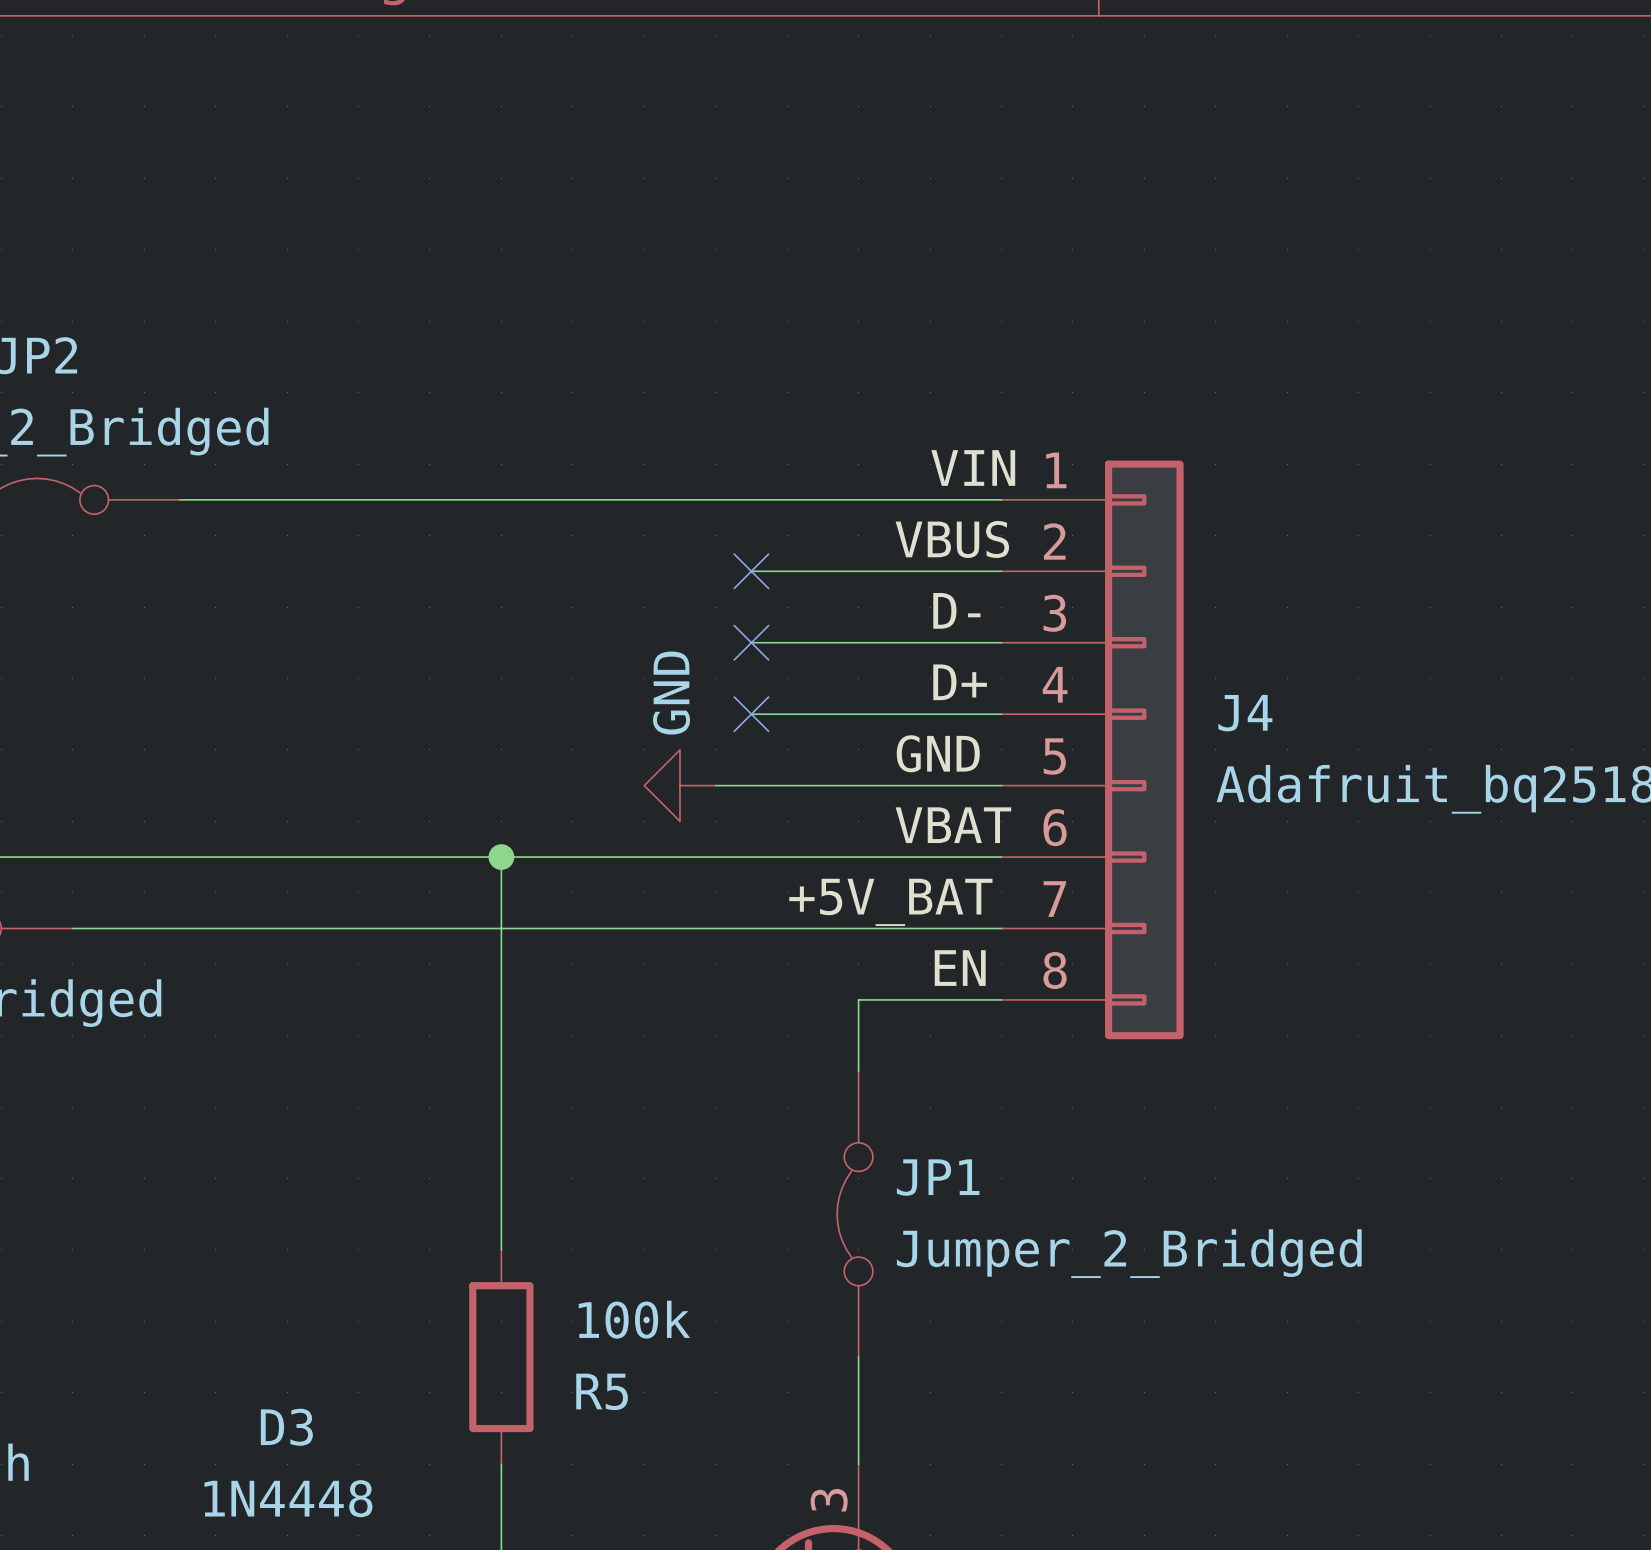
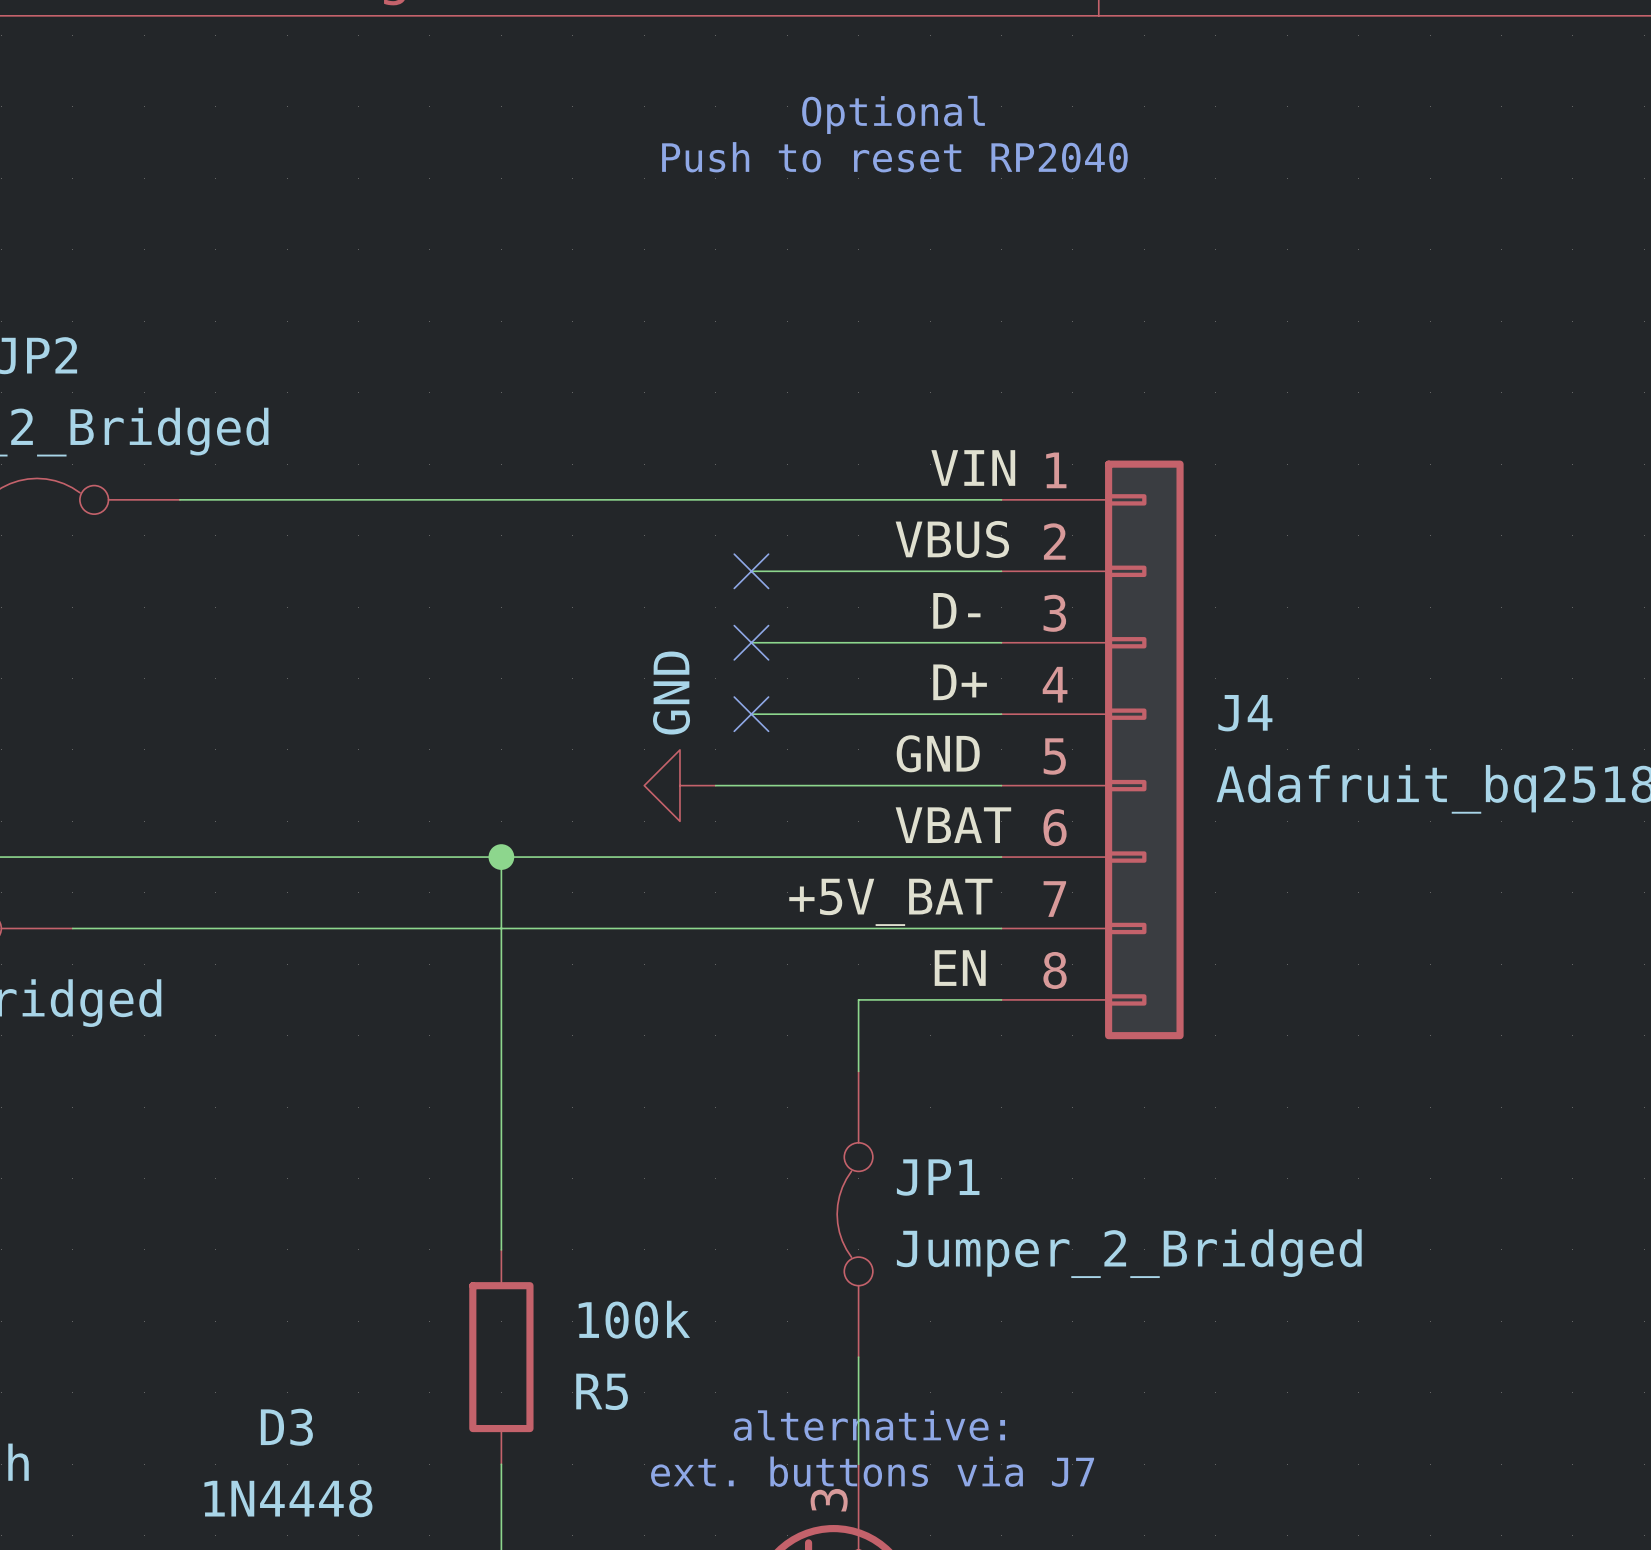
text: none -> Optional (893, 114)
text: none -> Push to reset RP2040 (894, 157)
text: none -> alternative: (869, 1425)
text: none -> ext. buttons via J7 (872, 1471)

